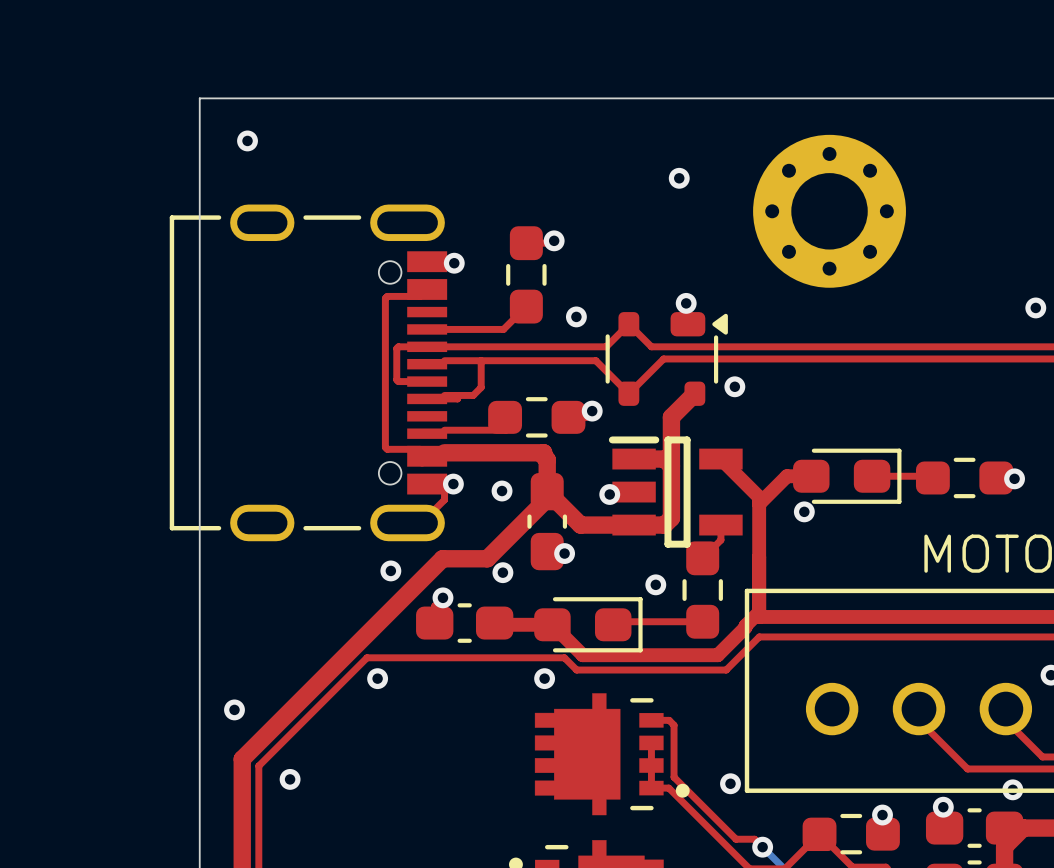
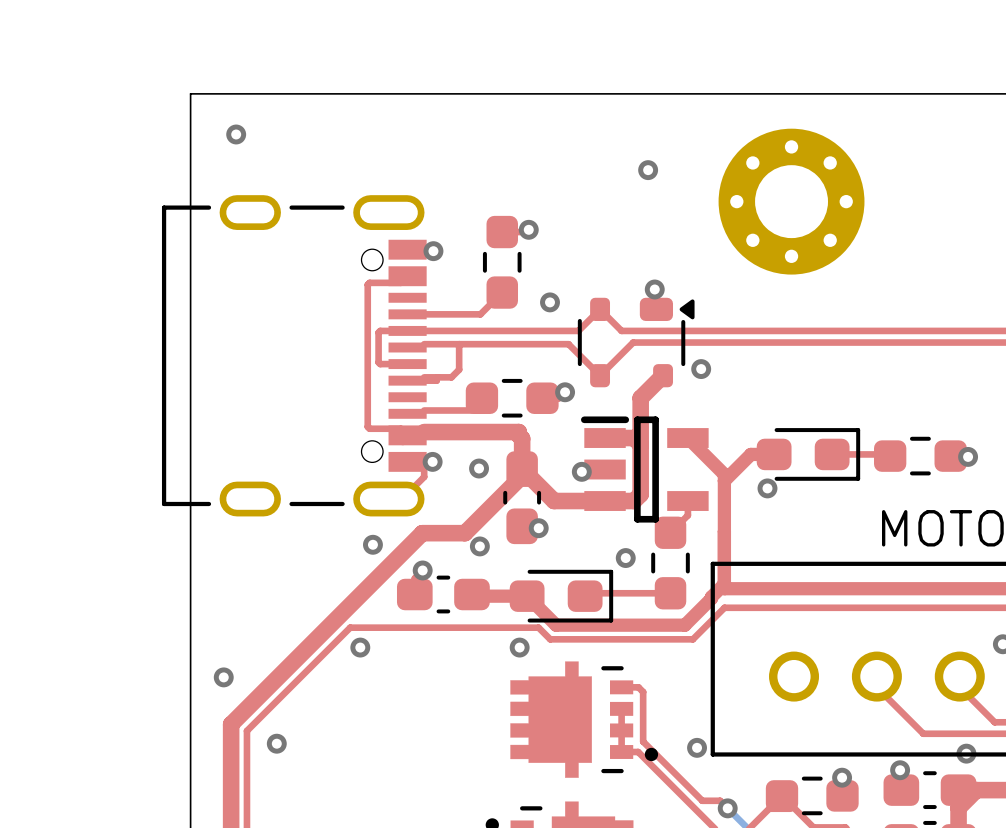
via: (1035, 307) -> none

